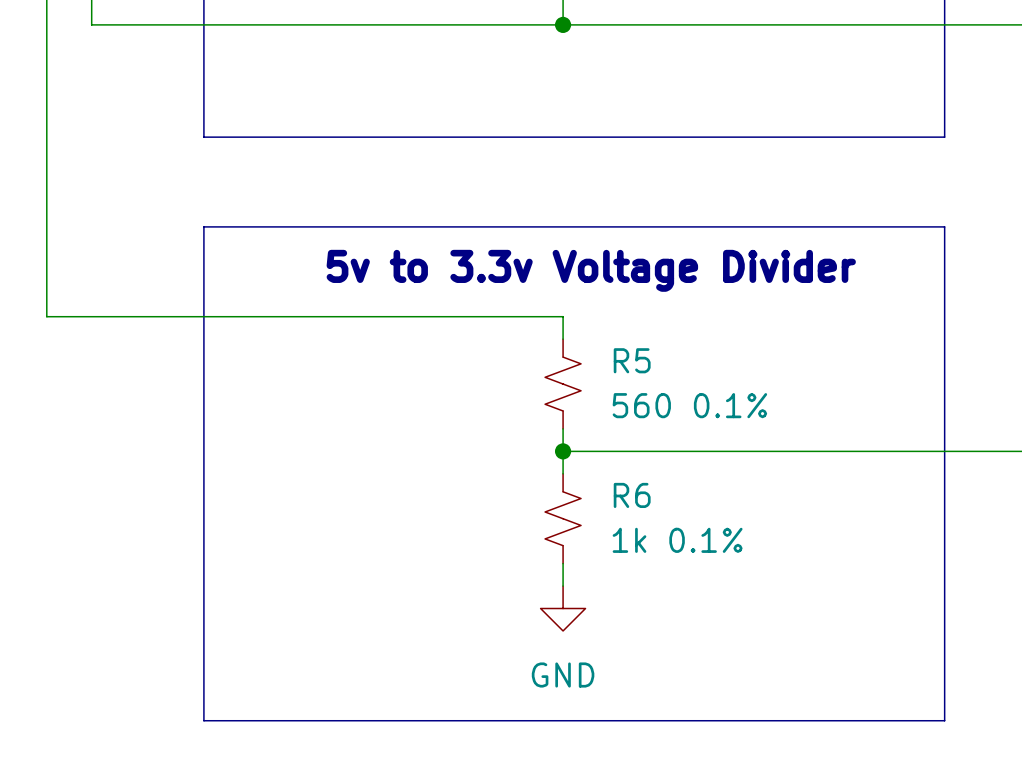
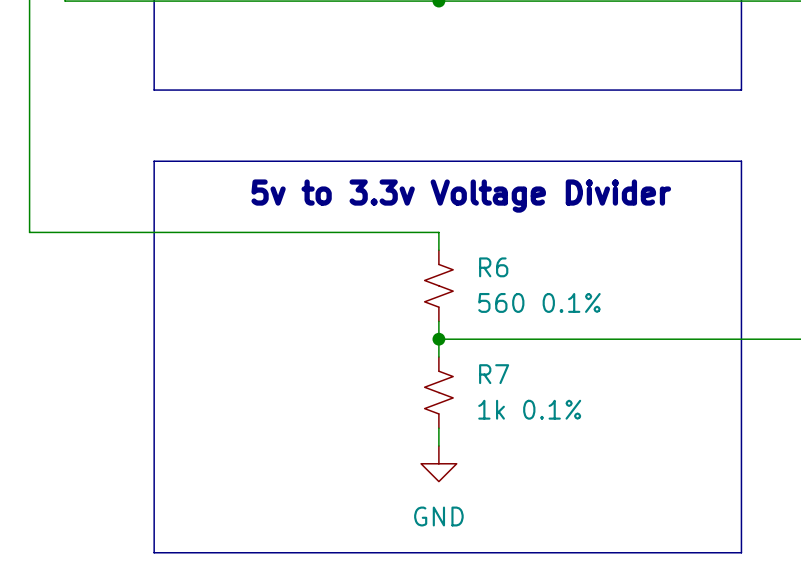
R5 name: R5 (632, 360) -> R6 (493, 267)
R6 name: R6 (632, 495) -> R7 (494, 374)

